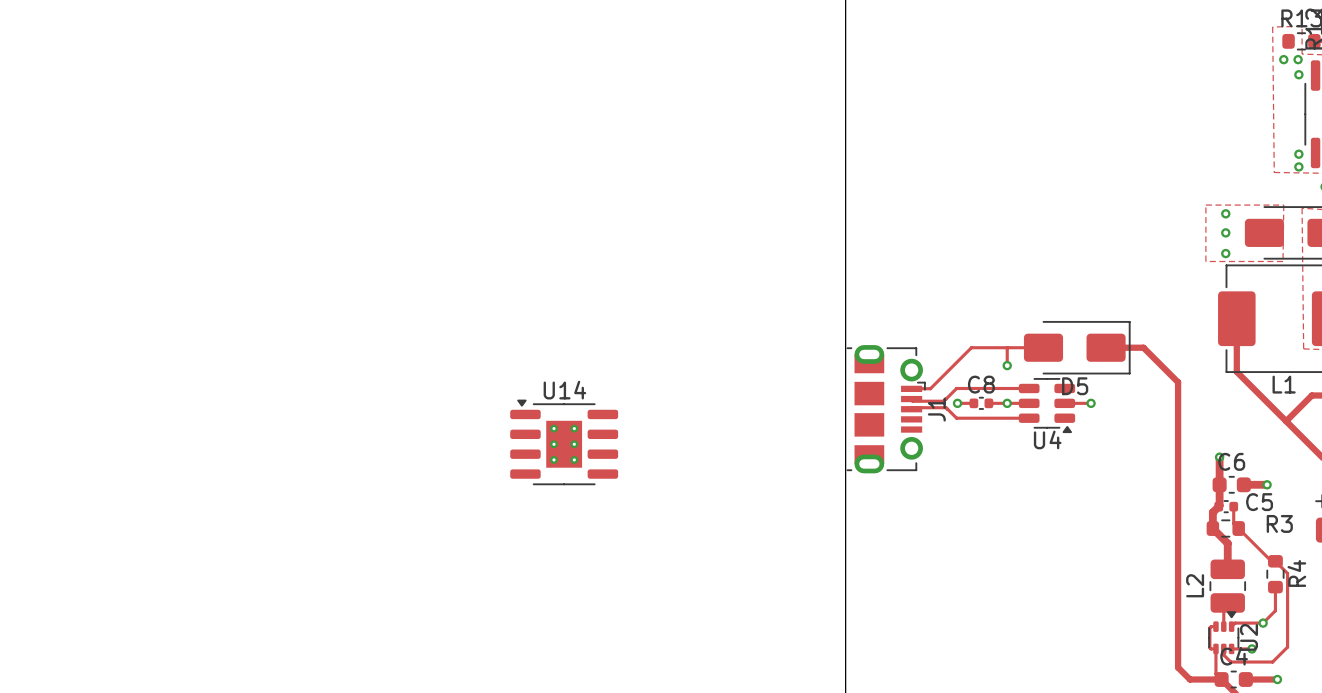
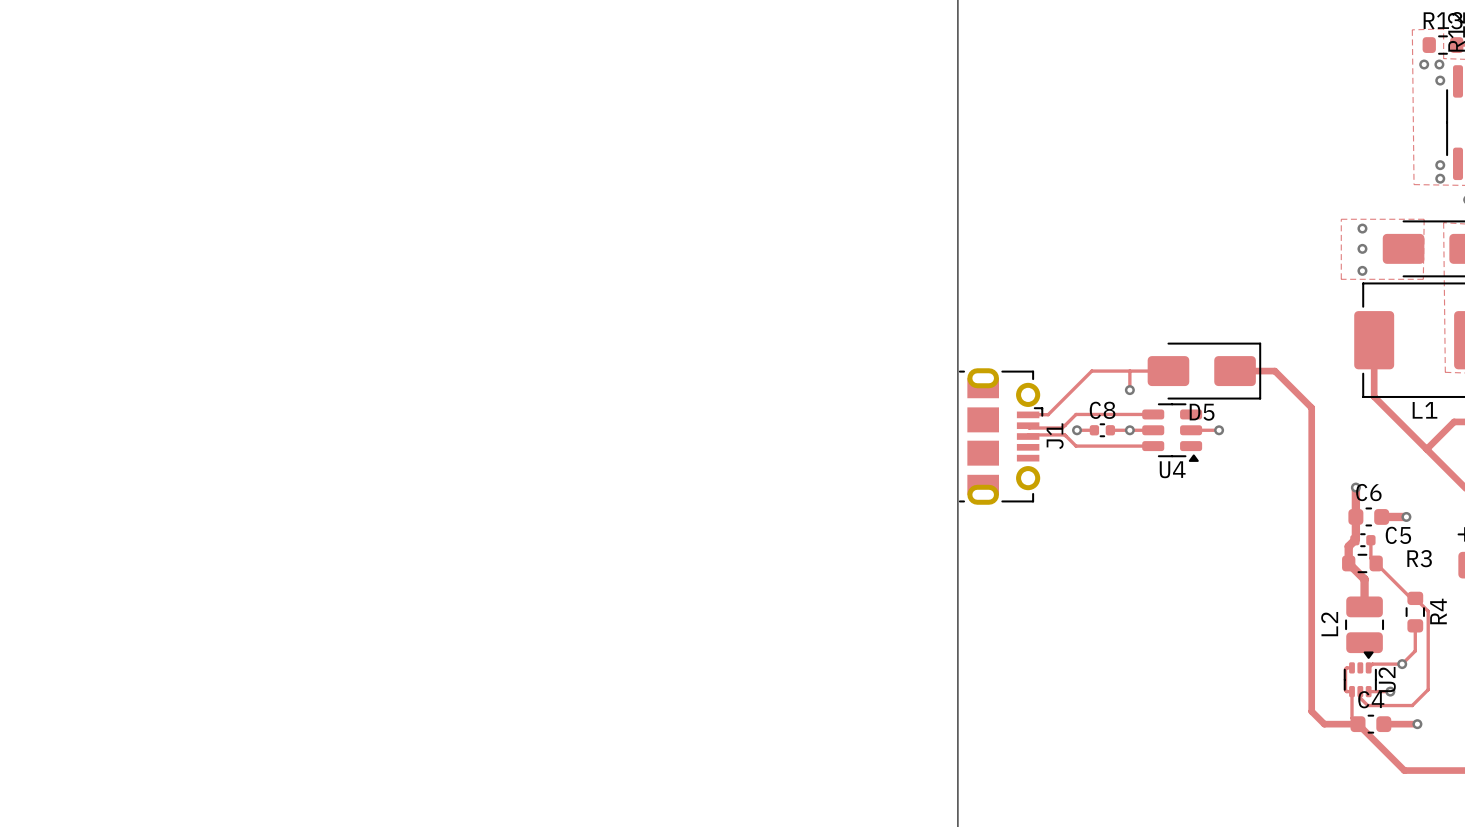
U14: (564, 442) -> none
track: (1223, 606) (1223, 626) -> none

